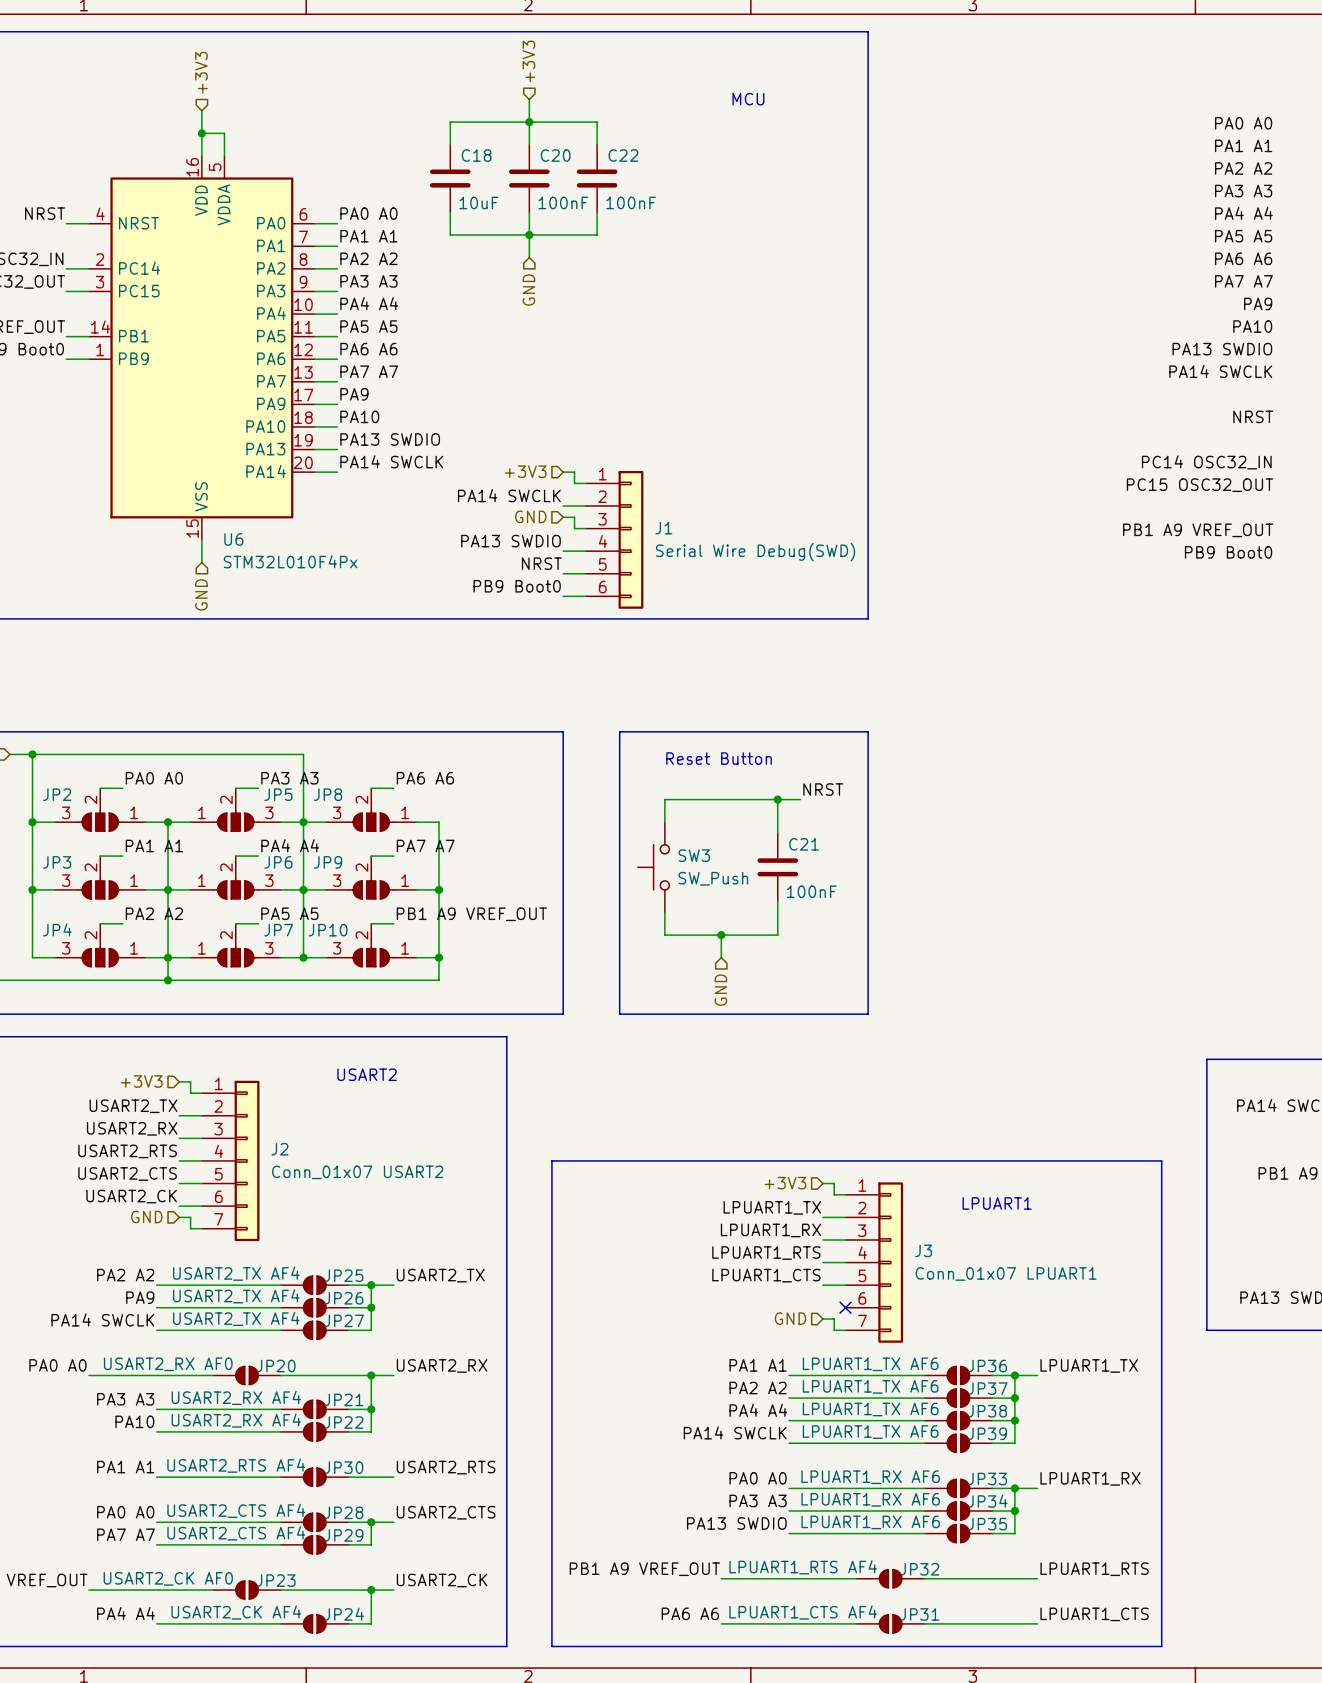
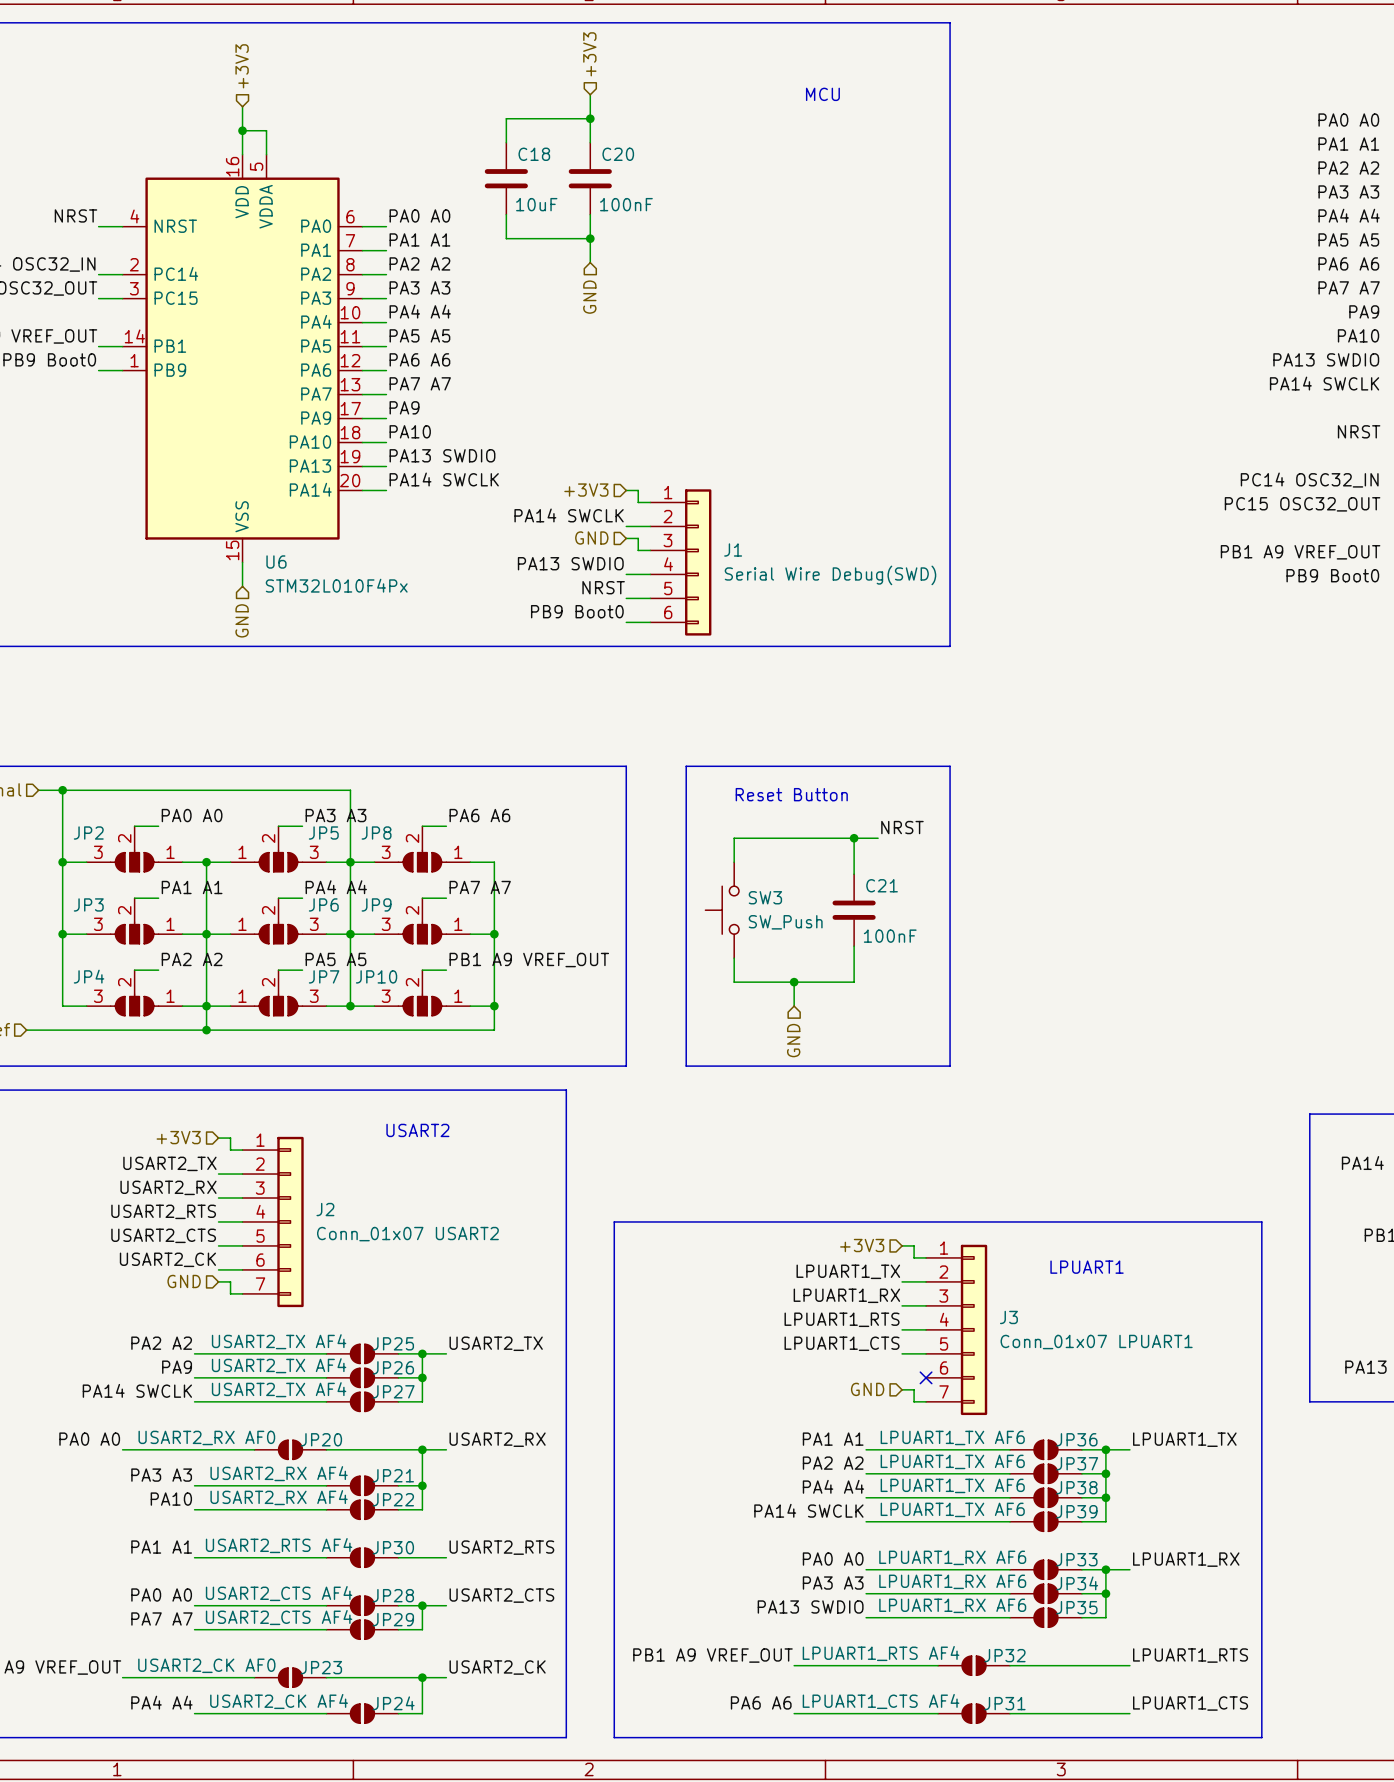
wire: (529, 122) (597, 122) (597, 144) -> none
C22: 100nF (597, 178) -> none
wire: (597, 212) (597, 235) (529, 235) -> none

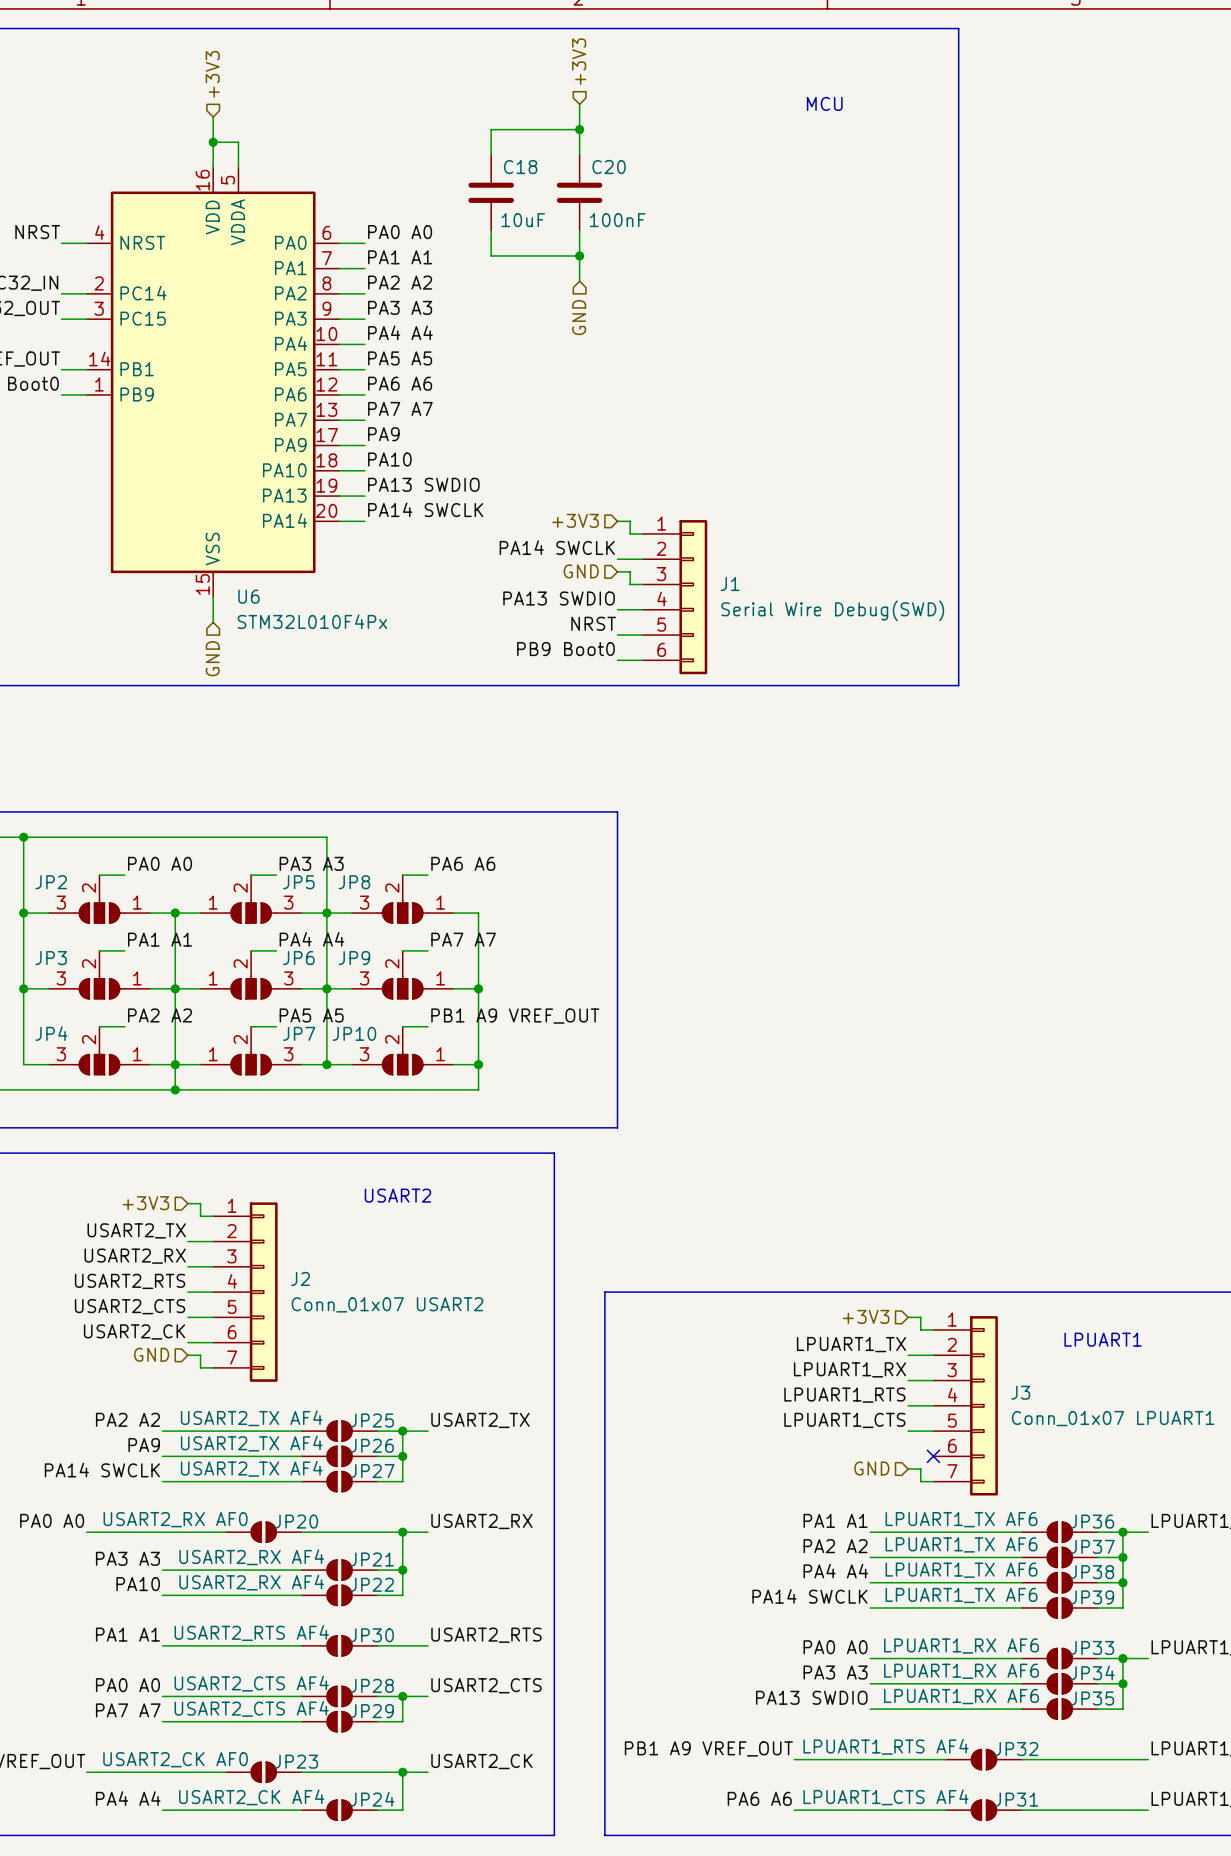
line: (686, 766) (950, 766) (950, 1066) (686, 1066) (686, 766) -> none
text: Reset Button (791, 794) -> none
label: NRST (902, 827) -> none
wire: (854, 838) (854, 874) -> none
junction: (854, 838) -> none
wire: (878, 838) (734, 838) (734, 862) -> none
SW3: SW_Push (722, 910) -> none
C21: 100nF (854, 910) -> none
wire: (854, 946) (854, 982) (734, 982) (734, 958) -> none
wire: (794, 982) (794, 1006) -> none
junction: (794, 982) -> none
hierarchical label: GND (793, 1040) -> none

